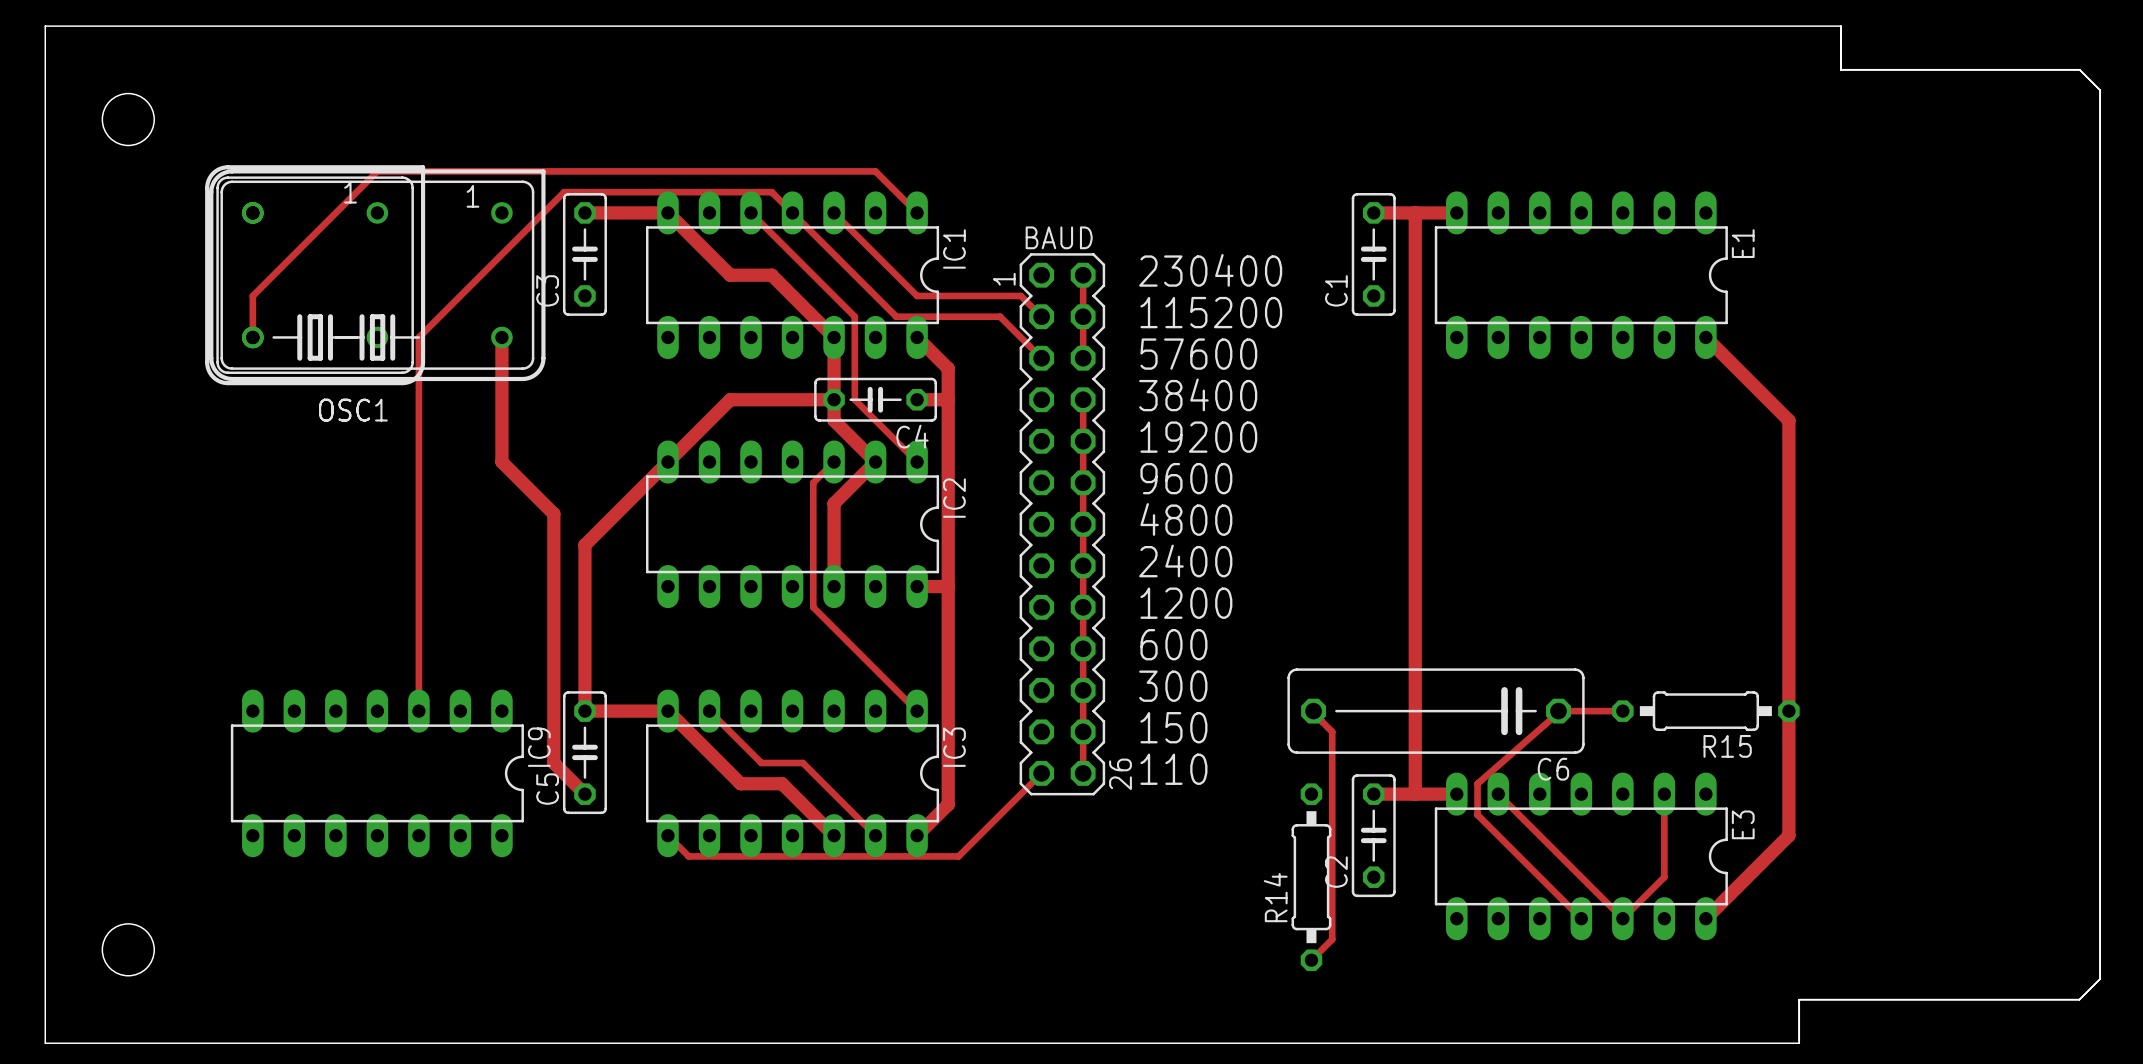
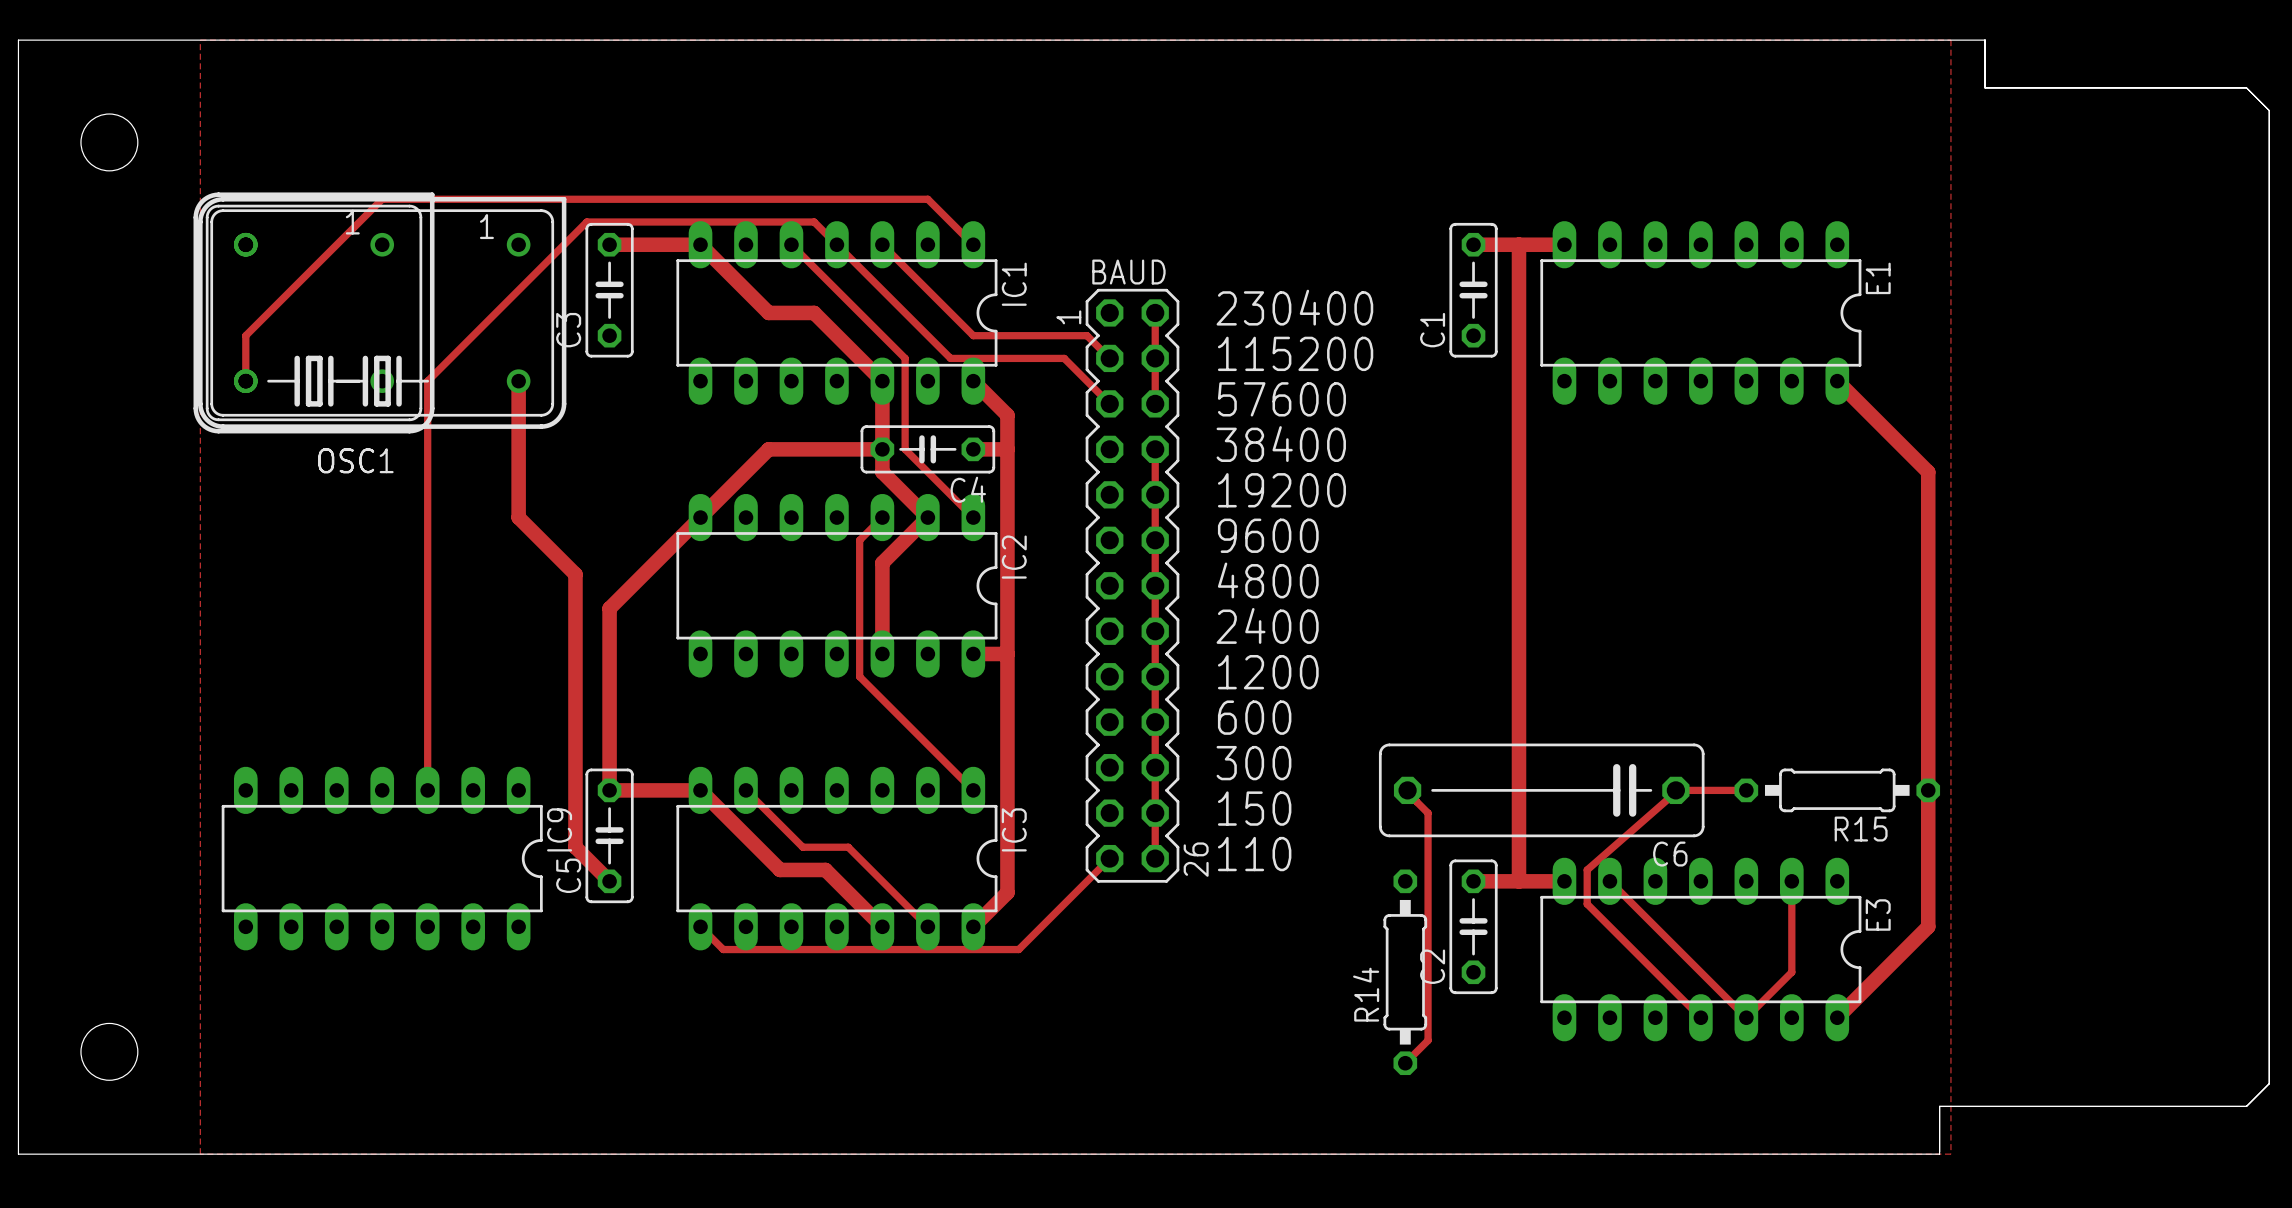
zone outline: none -> (200, 40) (200, 1154) (1950, 1154) (1950, 40) (200, 40)

